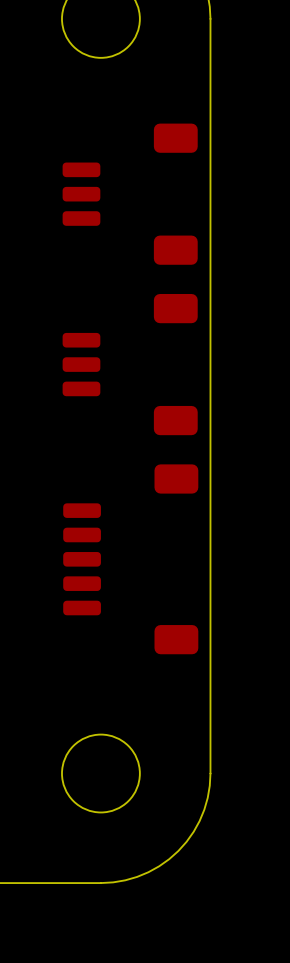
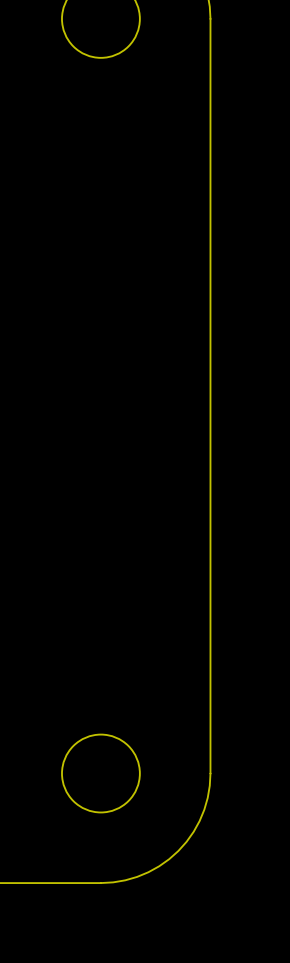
part: (130, 194) -> none
part: (130, 364) -> none
part: (130, 559) -> none

